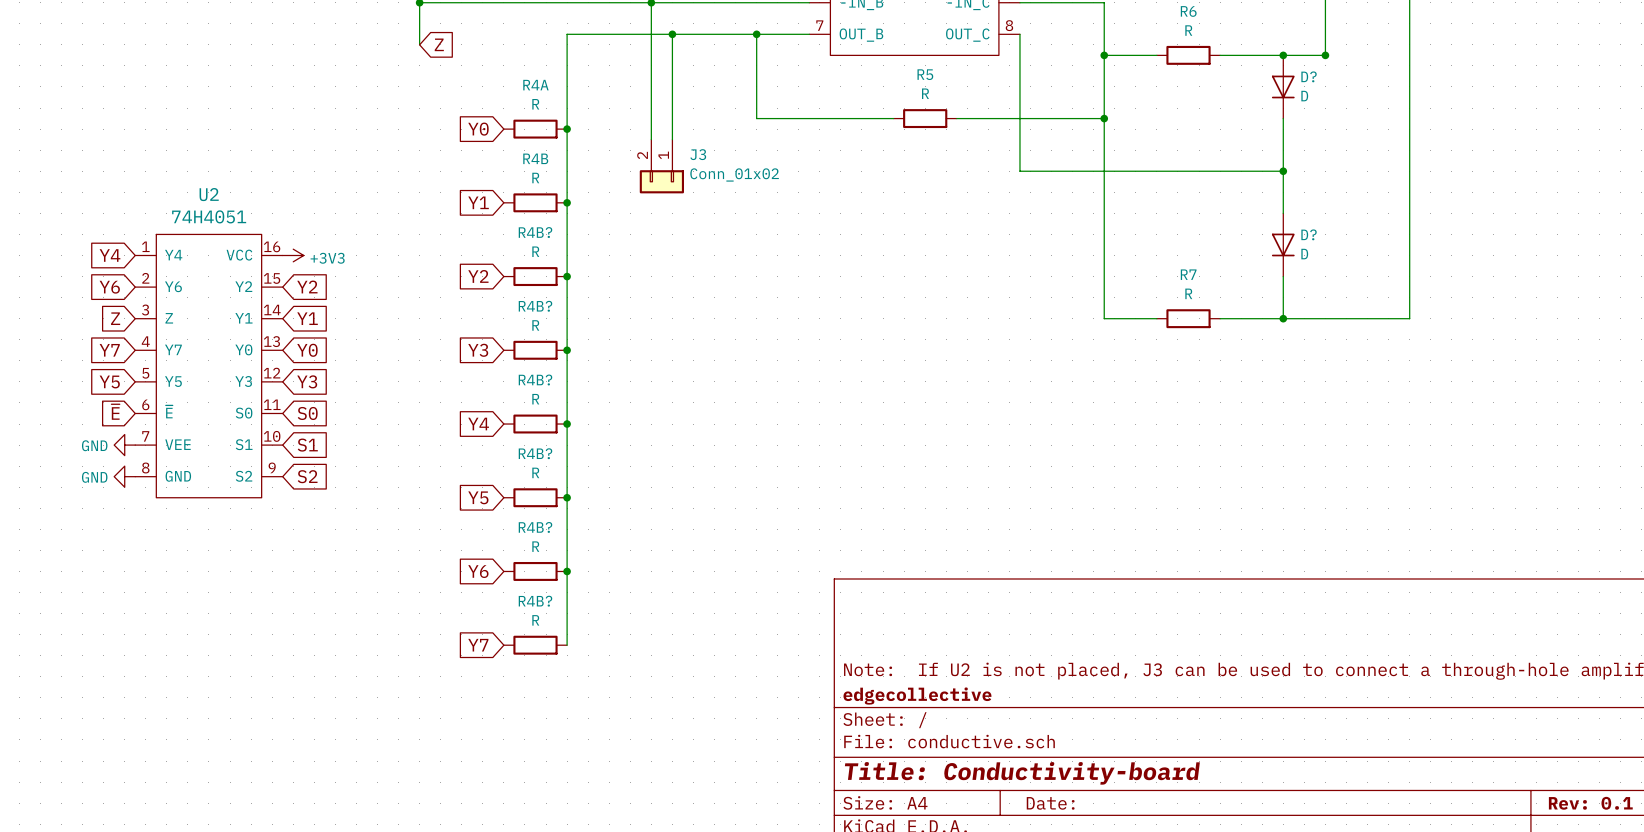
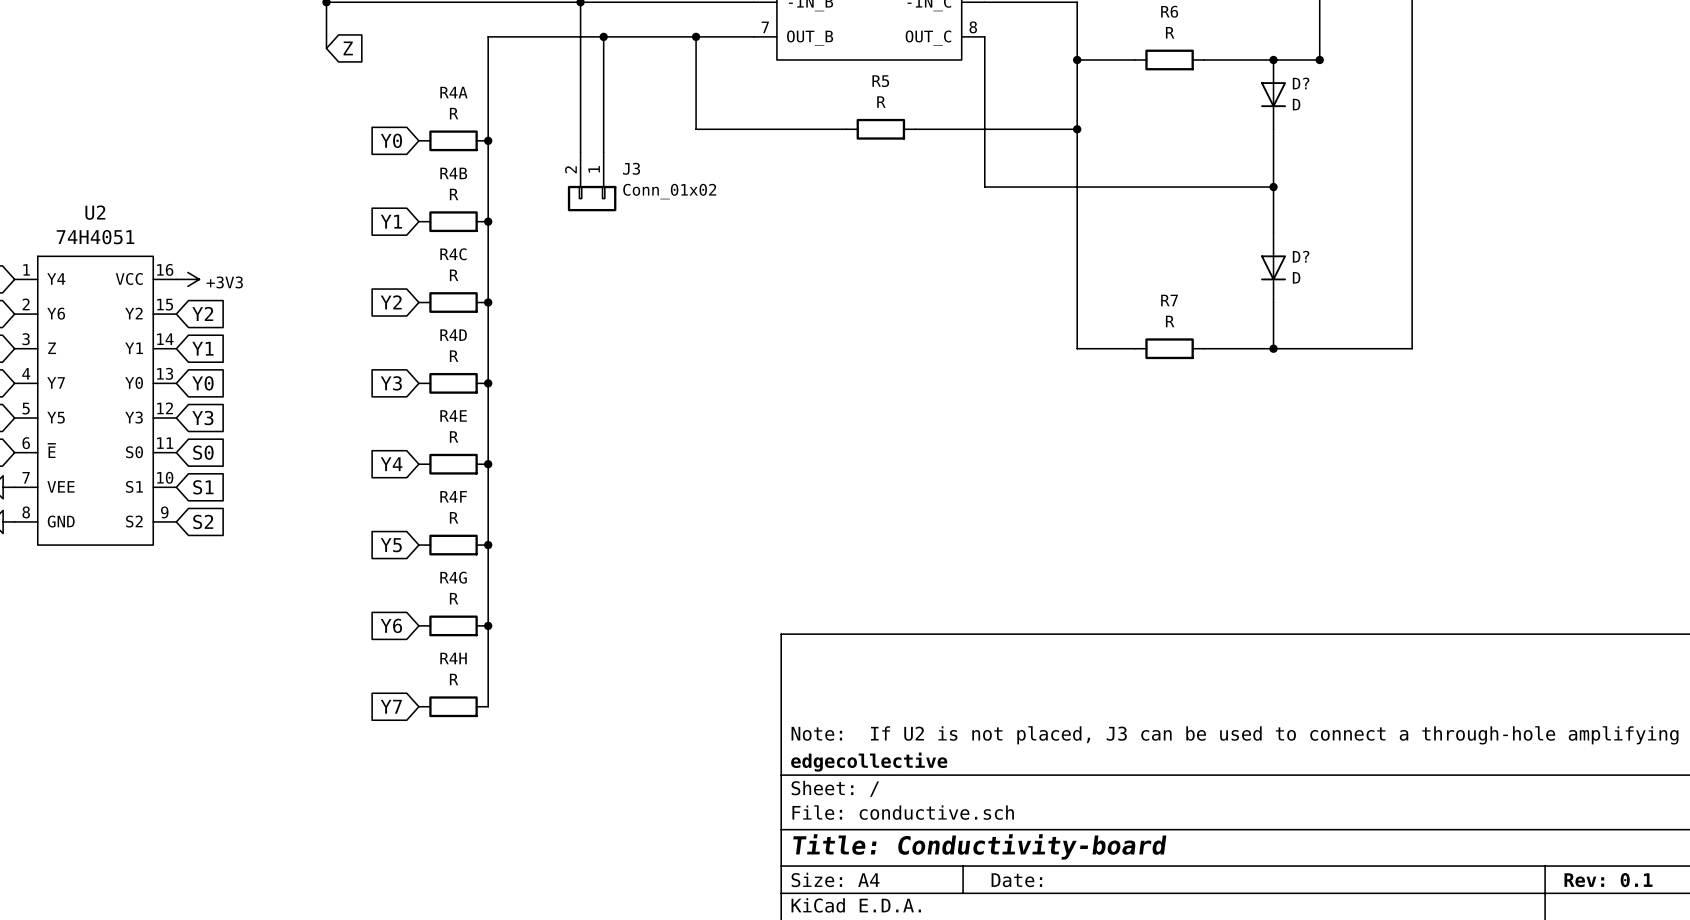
R4B? name: R4B? (535, 232) -> R4C (453, 254)
R4B? name: R4B? (535, 306) -> R4D (453, 335)
R4B? name: R4B? (535, 379) -> R4E (453, 415)
R4B? name: R4B? (535, 453) -> R4F (453, 496)
R4B? name: R4B? (535, 527) -> R4G (453, 577)
R4B? name: R4B? (535, 601) -> R4H (453, 658)

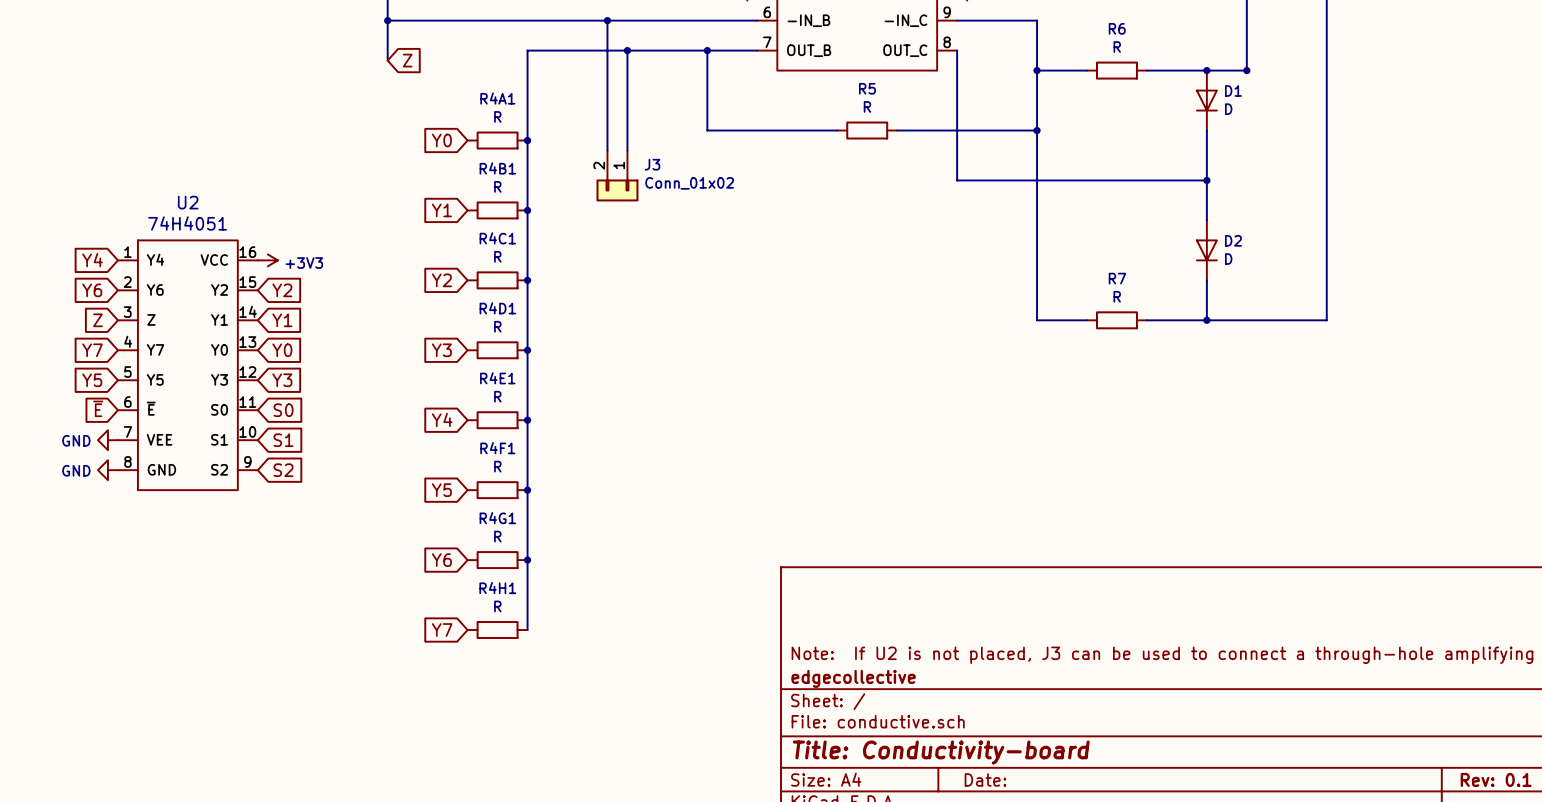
D? name: D? (1301, 83) -> D1 (1233, 90)
R4A name: R4A (453, 92) -> R4A1 (497, 98)
R4B name: R4B (453, 173) -> R4B1 (497, 168)
R4C name: R4C (453, 254) -> R4C1 (497, 238)
D? name: D? (1301, 256) -> D2 (1233, 240)
R4D name: R4D (453, 335) -> R4D1 (497, 308)
R4E name: R4E (453, 415) -> R4E1 (497, 378)
R4F name: R4F (453, 496) -> R4F1 (497, 448)
R4G name: R4G (453, 577) -> R4G1 (497, 518)
R4H name: R4H (453, 658) -> R4H1 (497, 588)

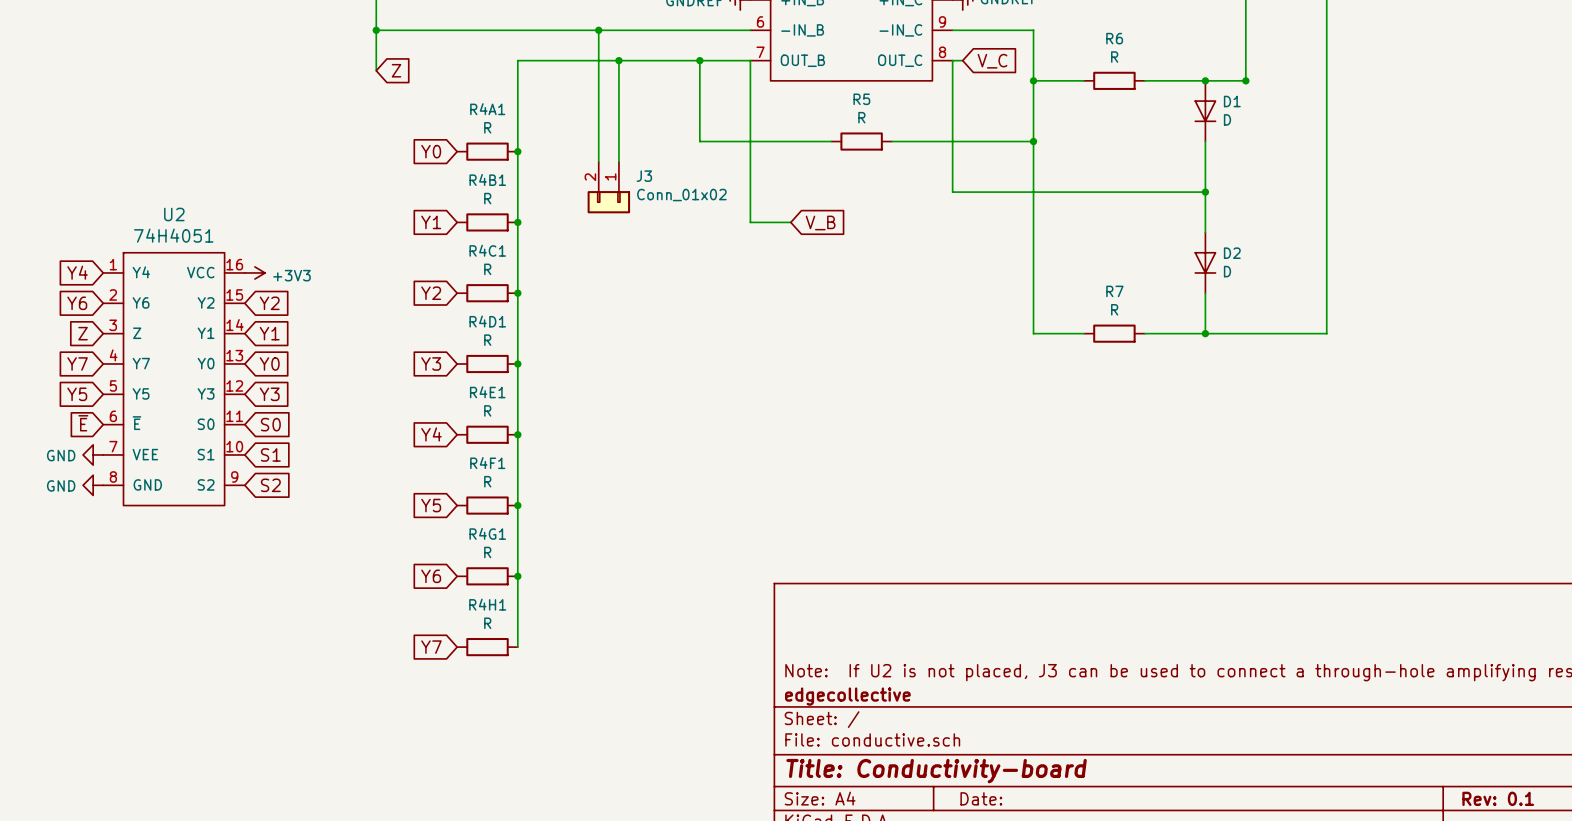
wire: none -> (750, 60) (750, 222) (790, 222)
wire: none -> (952, 60) (962, 60)
global label: none -> V_C (992, 61)
global label: none -> V_B (820, 223)

